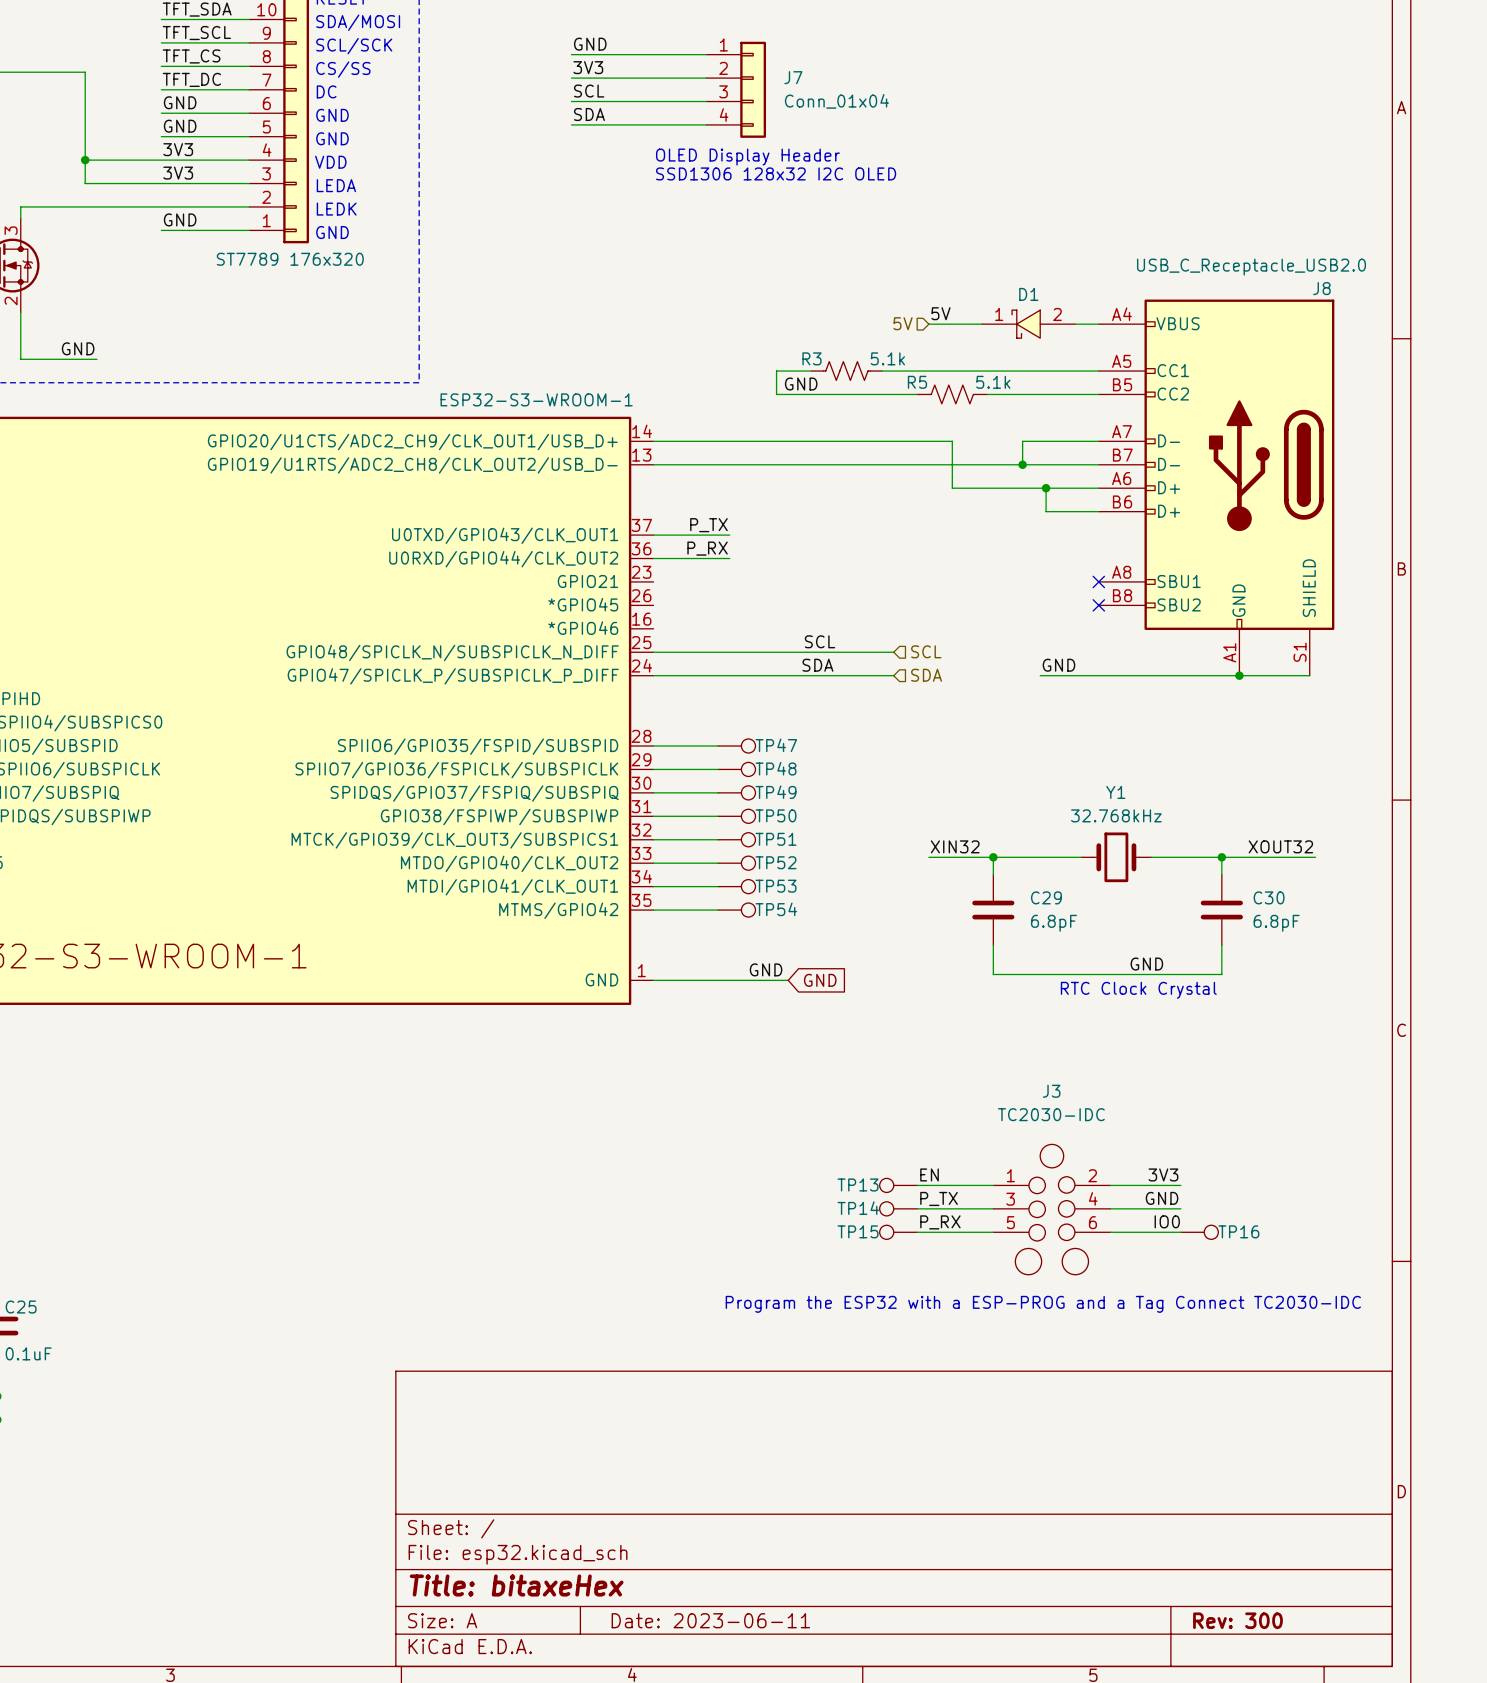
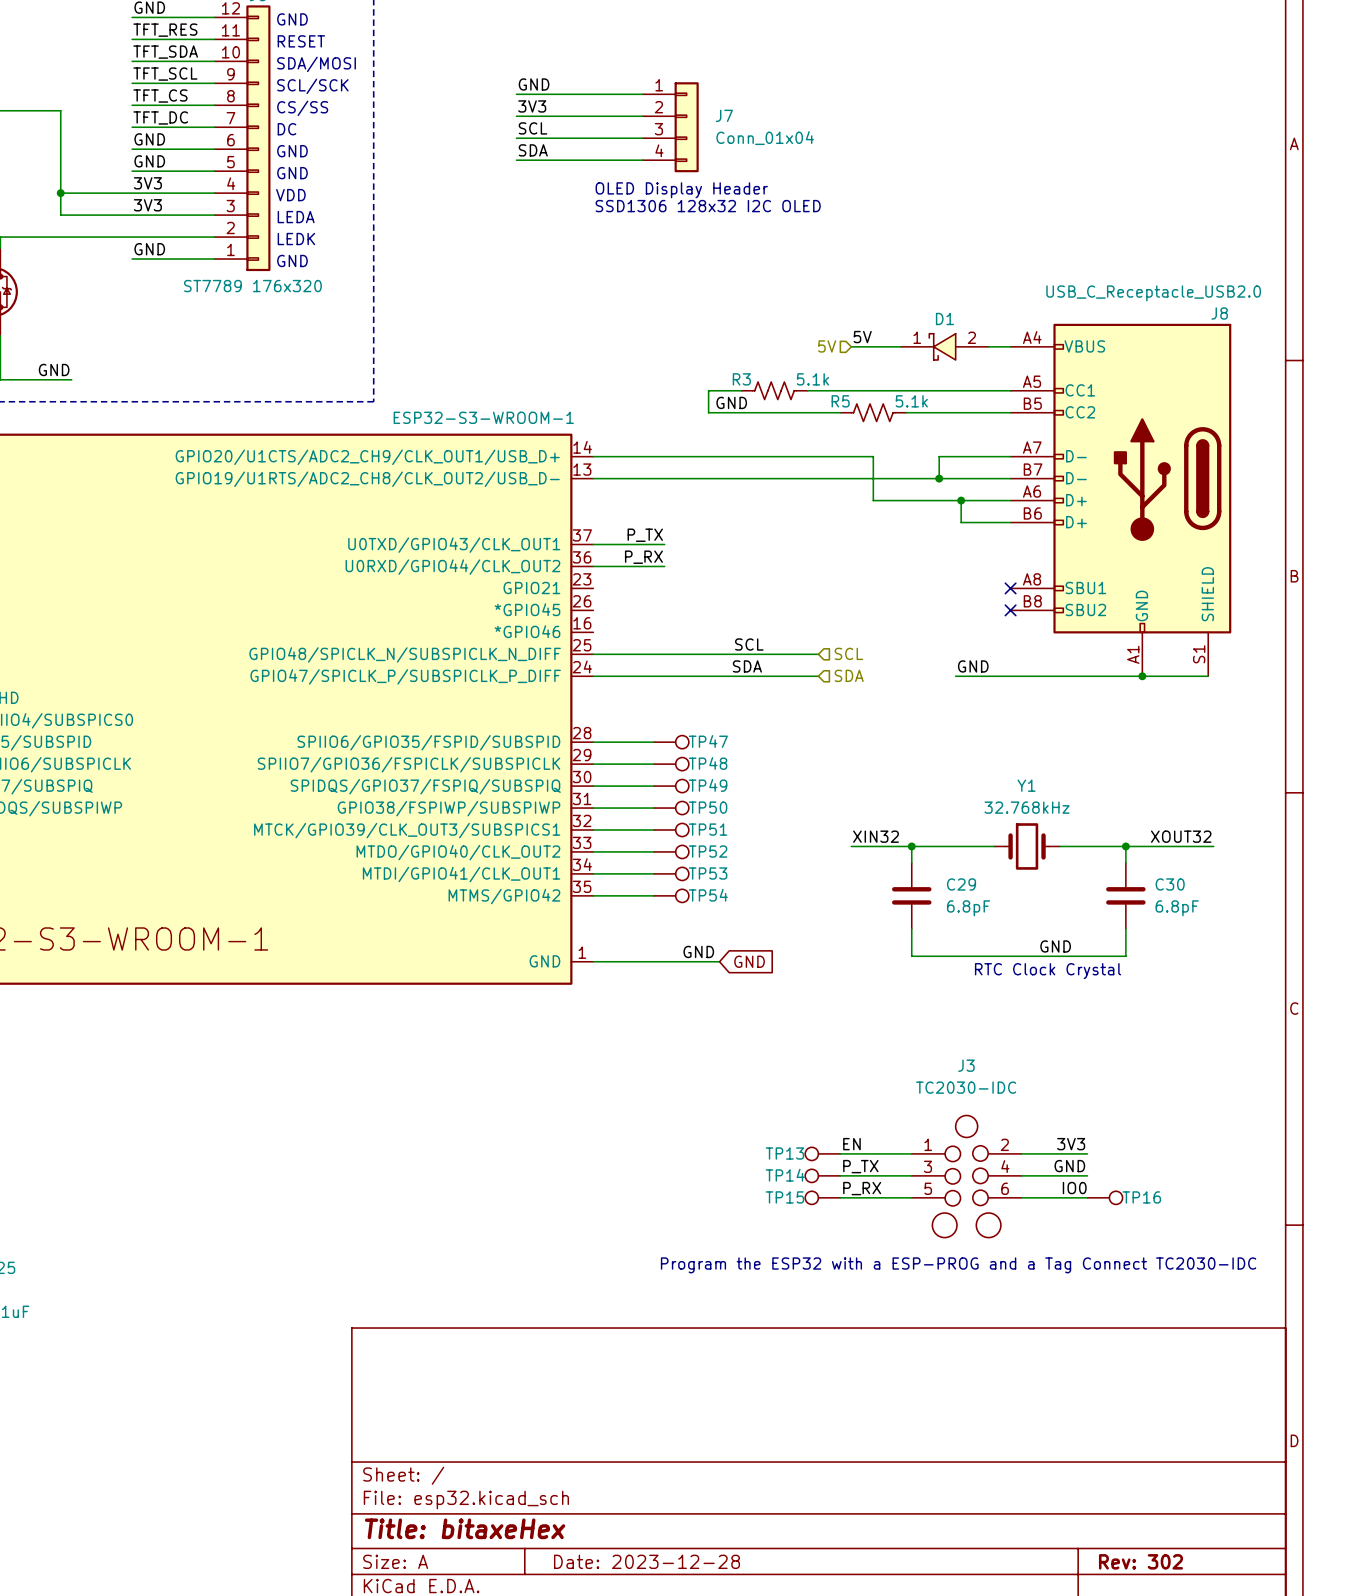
title block: Date: 2023-06-11 (710, 1620) -> Date: 2023-12-28 (647, 1561)
title block: Rev: 300 (1237, 1620) -> Rev: 302 (1140, 1561)

